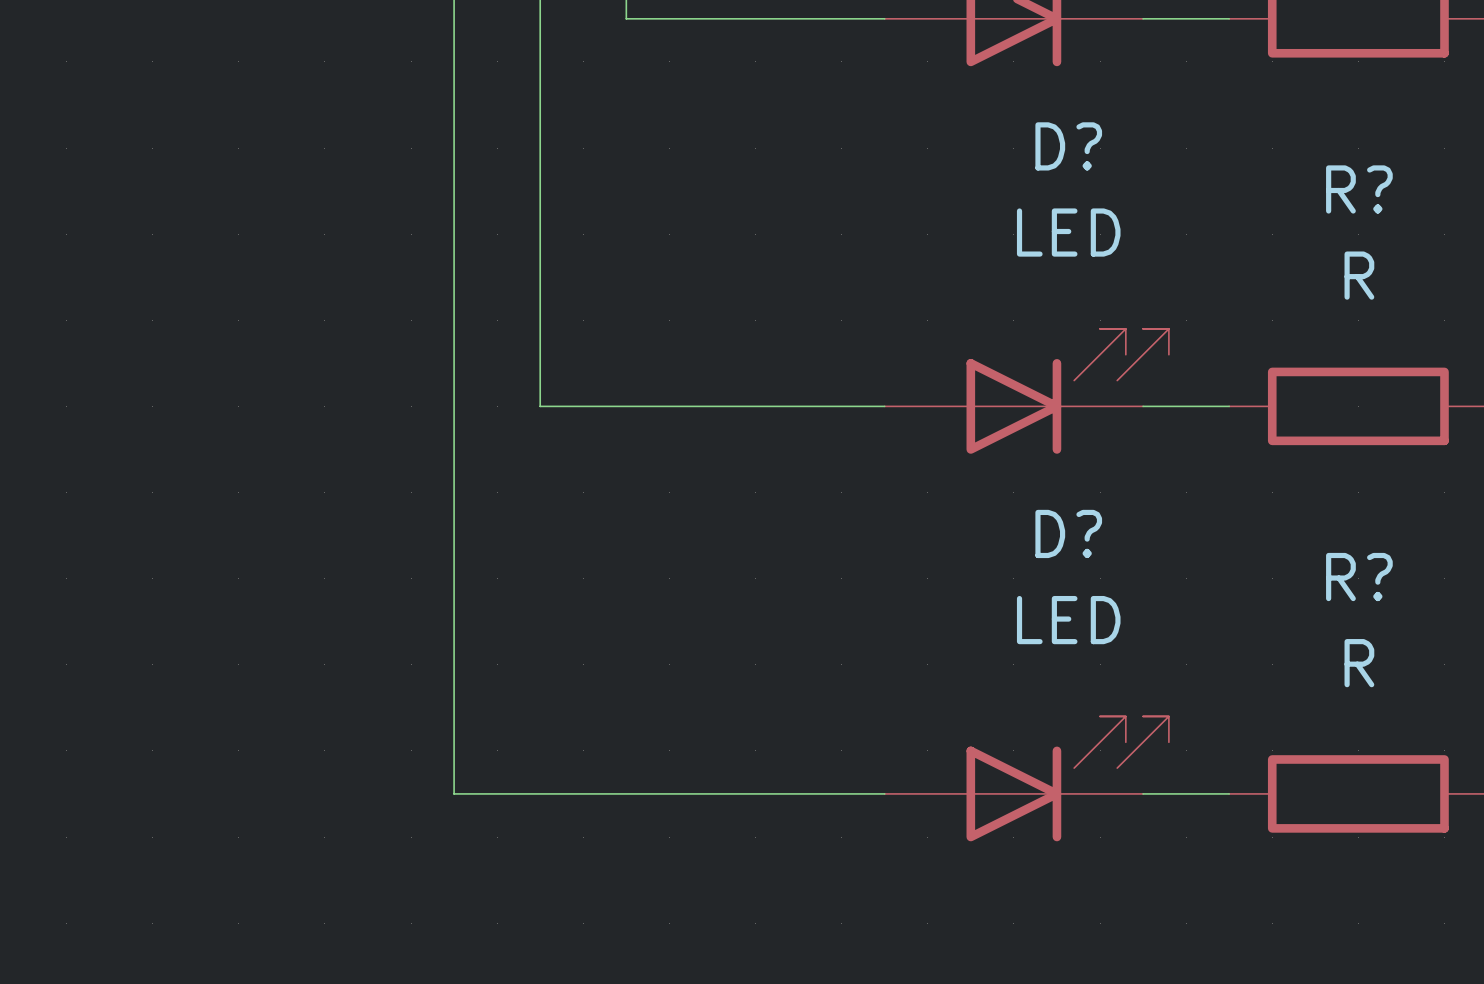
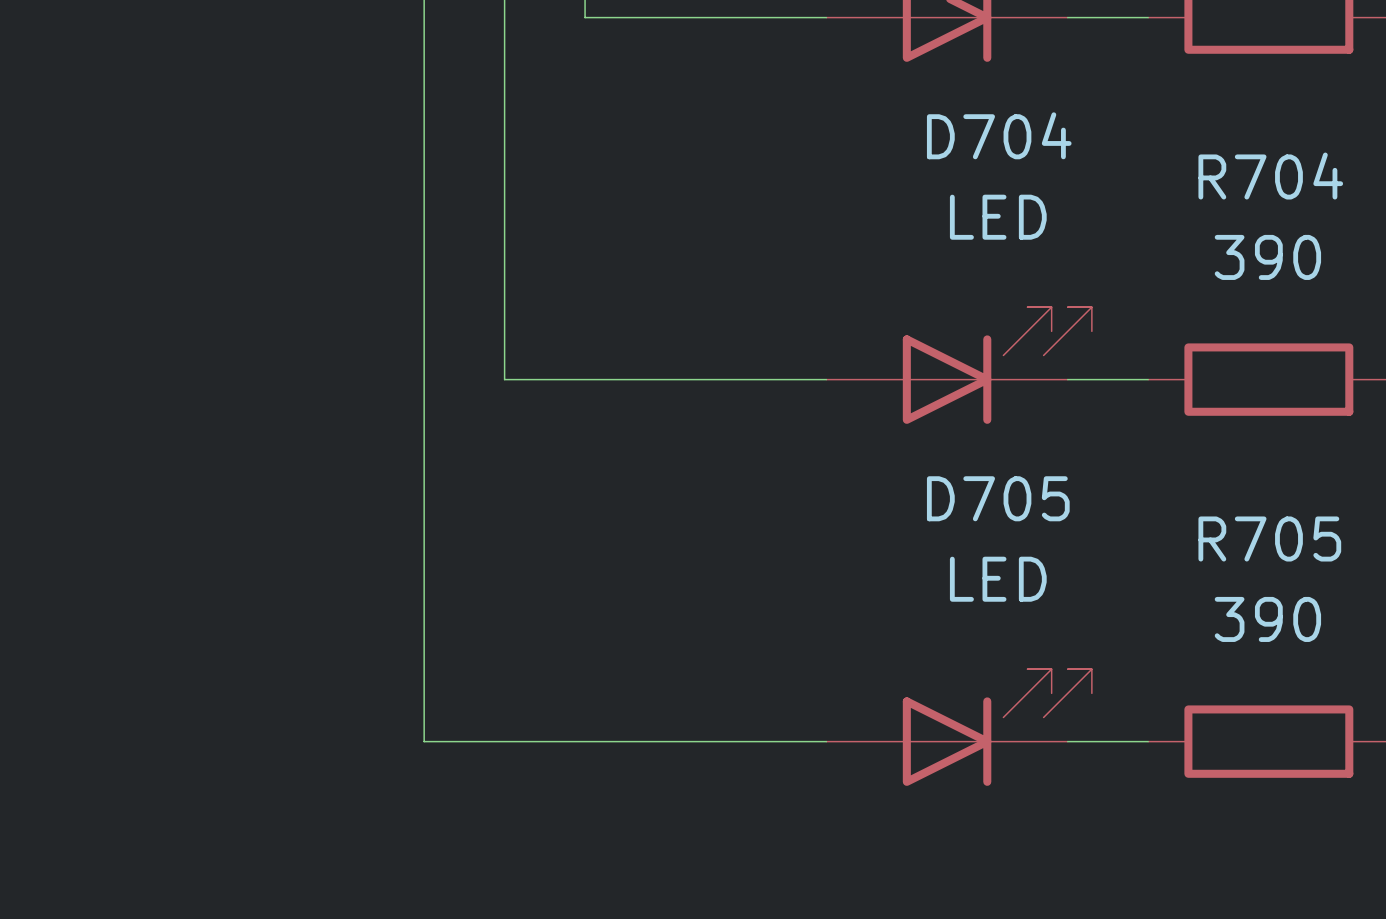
D? name: D? (1068, 146) -> D704 (999, 135)
R? name: R? (1359, 189) -> R704 (1270, 176)
R? value: R (1359, 275) -> 390 (1267, 257)
D? name: D? (1068, 533) -> D705 (998, 498)
R? name: R? (1359, 577) -> R705 (1269, 538)
R? value: R (1359, 663) -> 390 (1267, 619)

